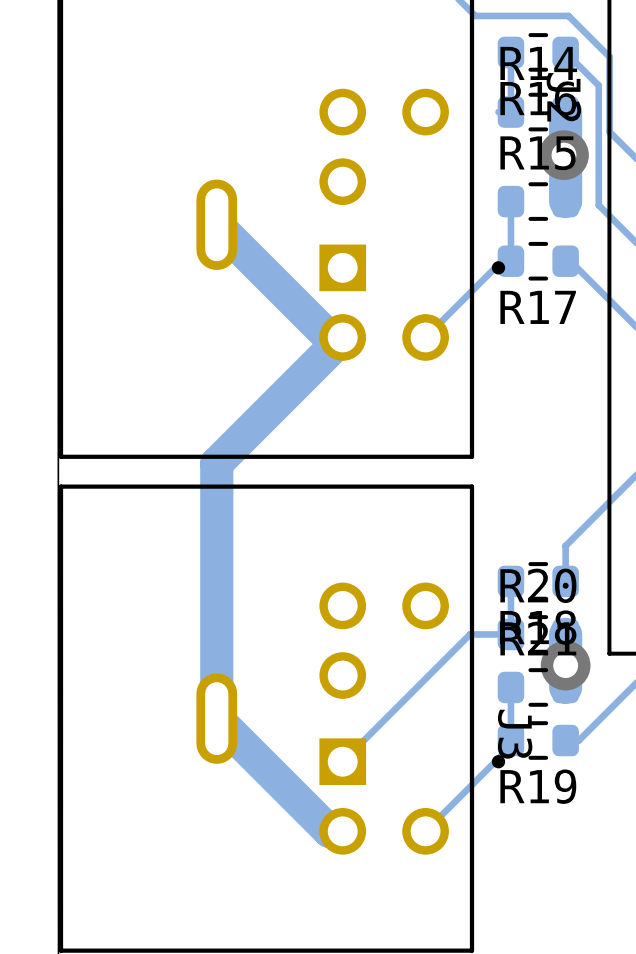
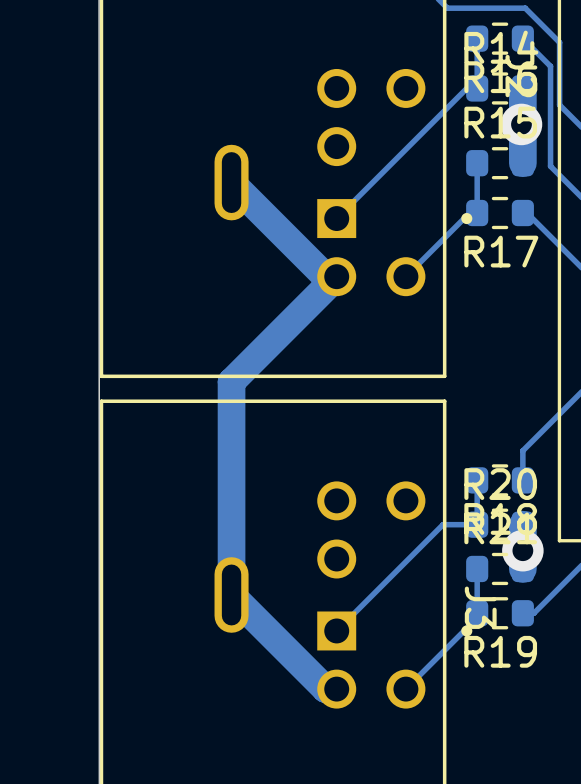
track: none -> (466, 88) (336, 218)

